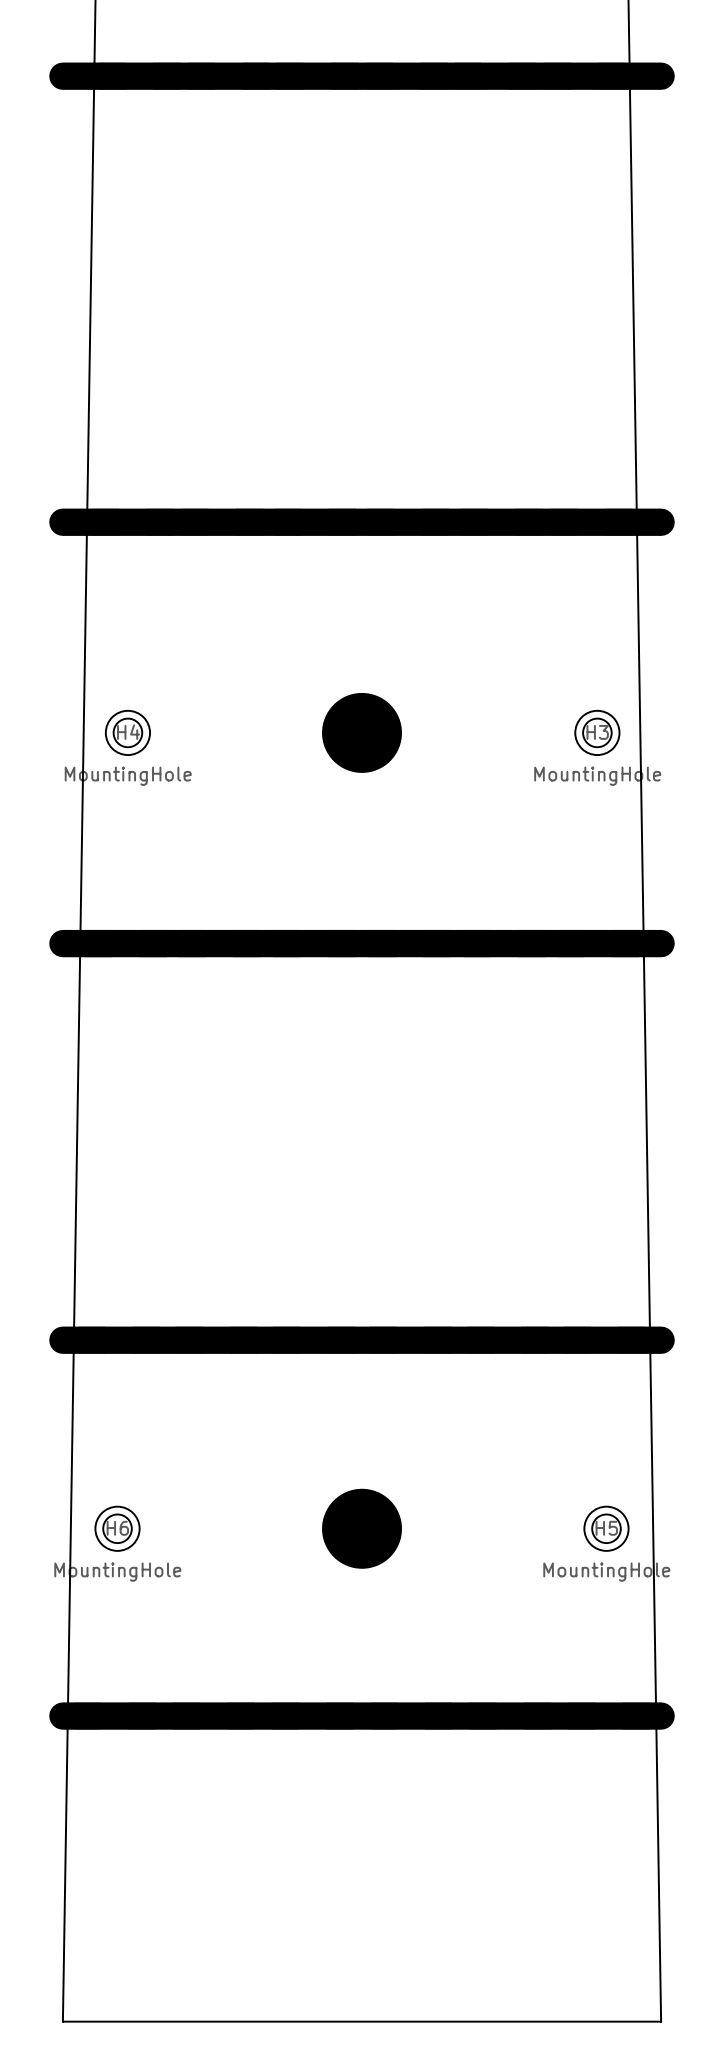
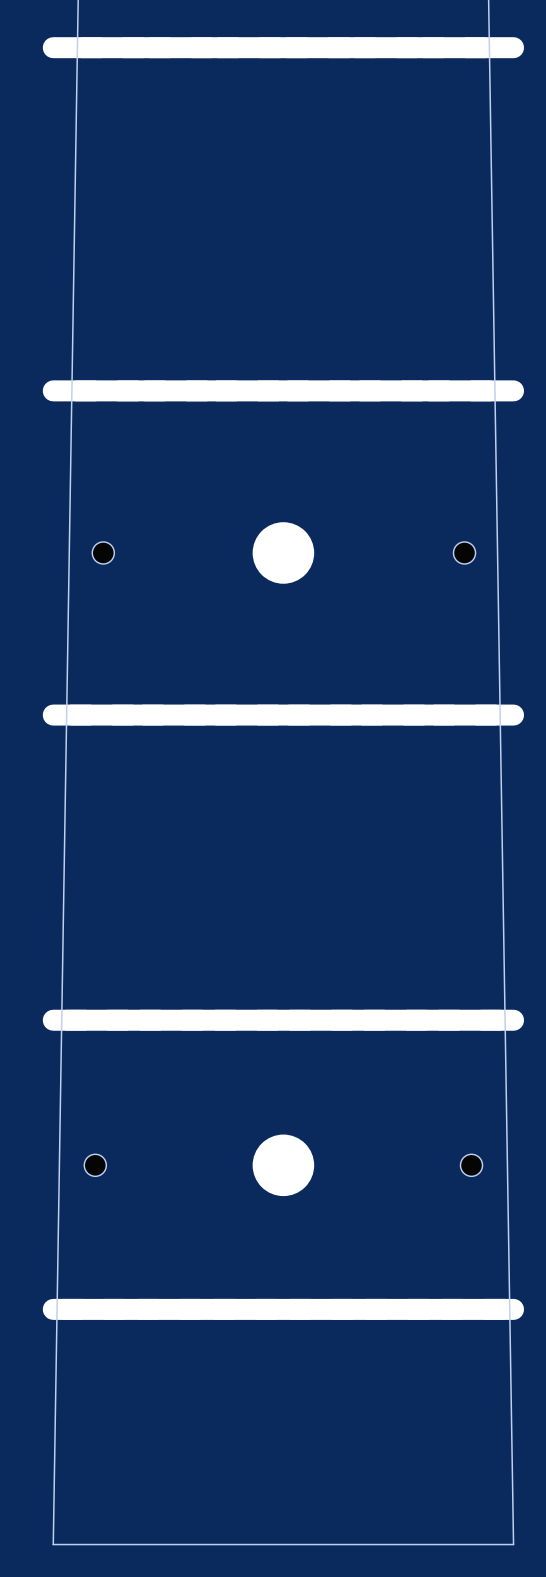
H4 side: bottom (127, 732) -> top (103, 552)
H3 side: bottom (597, 732) -> top (464, 552)
H6 side: bottom (117, 1528) -> top (95, 1165)
H5 side: bottom (606, 1528) -> top (471, 1165)

